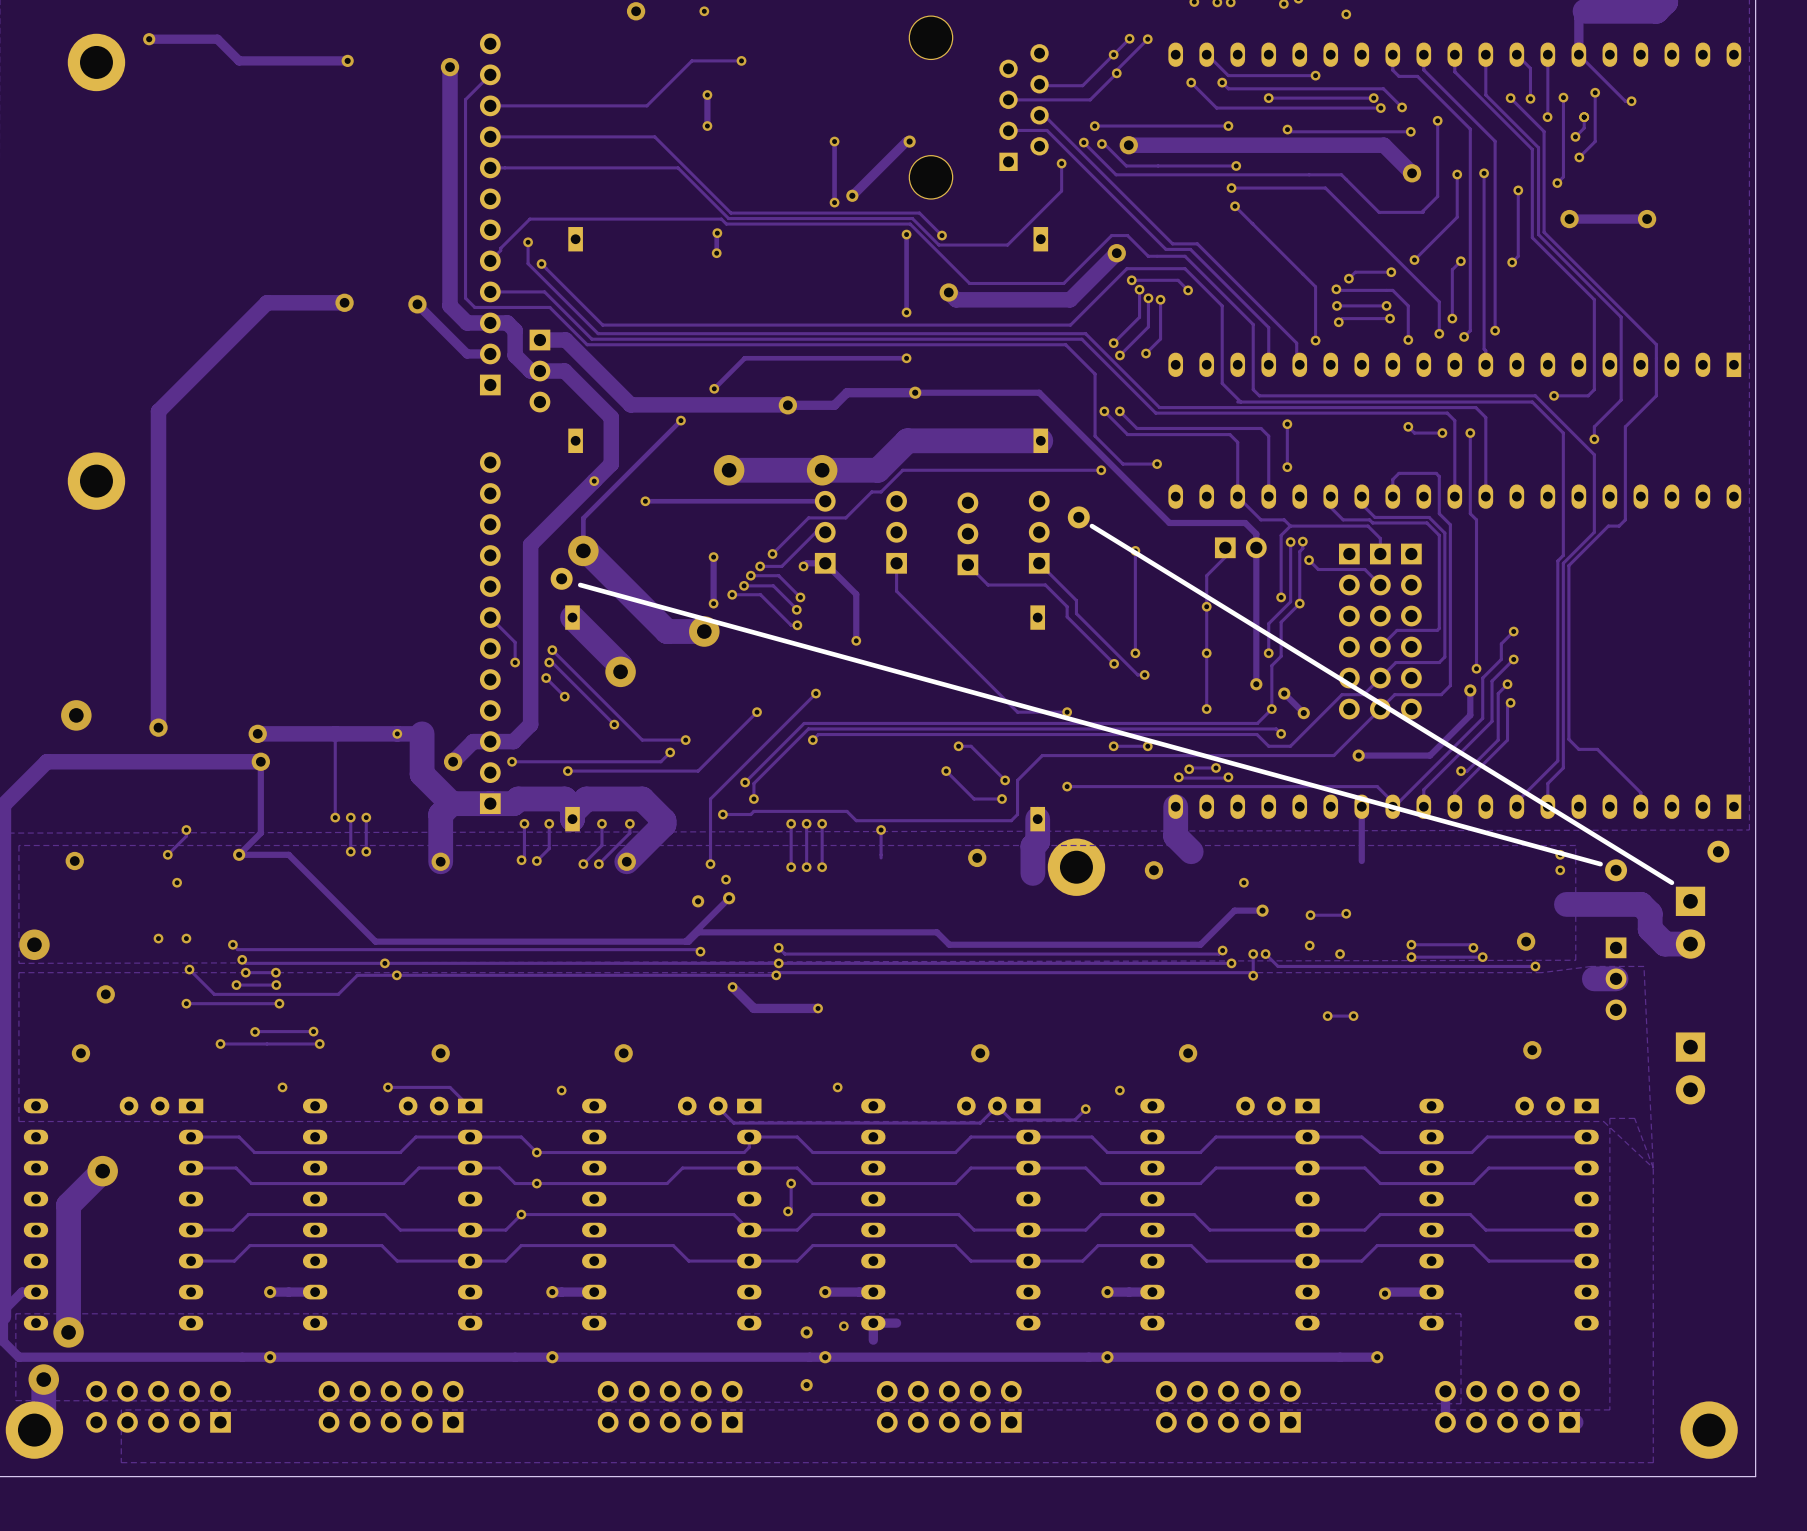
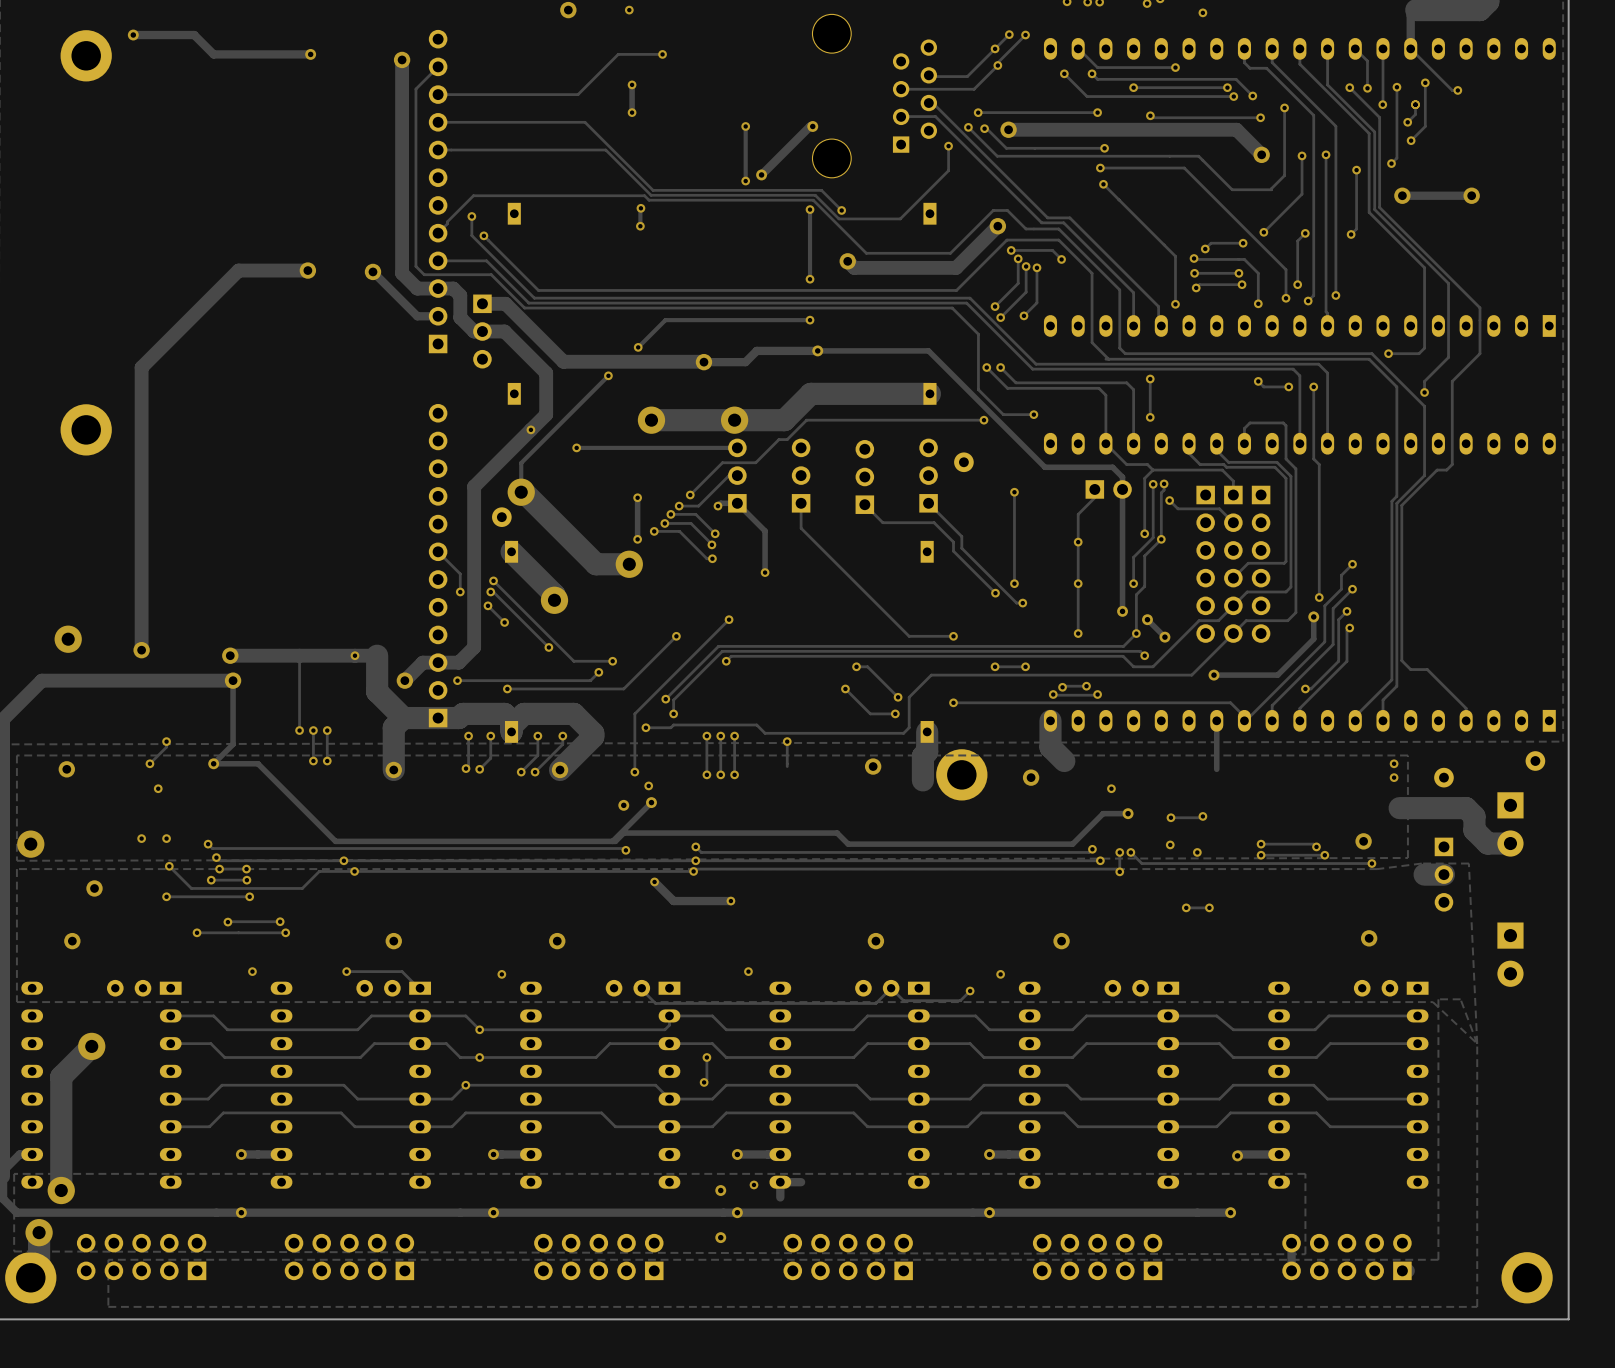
line: (1091, 526) (1671, 882) -> none
line: (580, 585) (1600, 864) -> none

